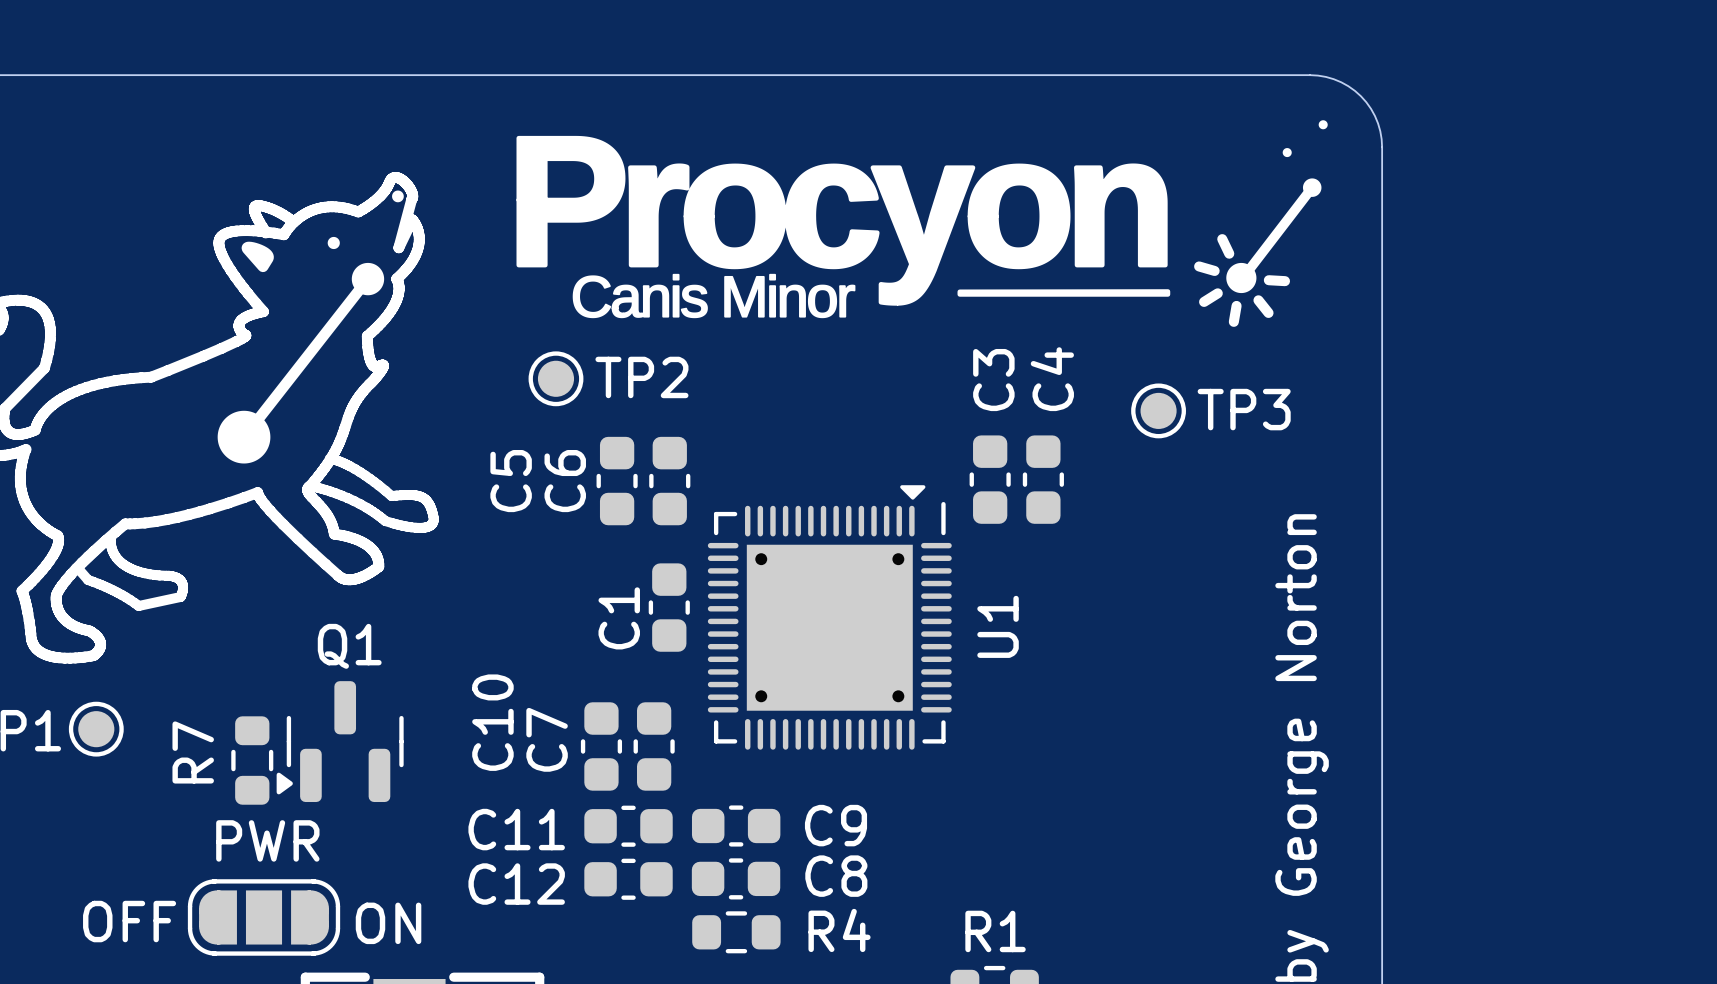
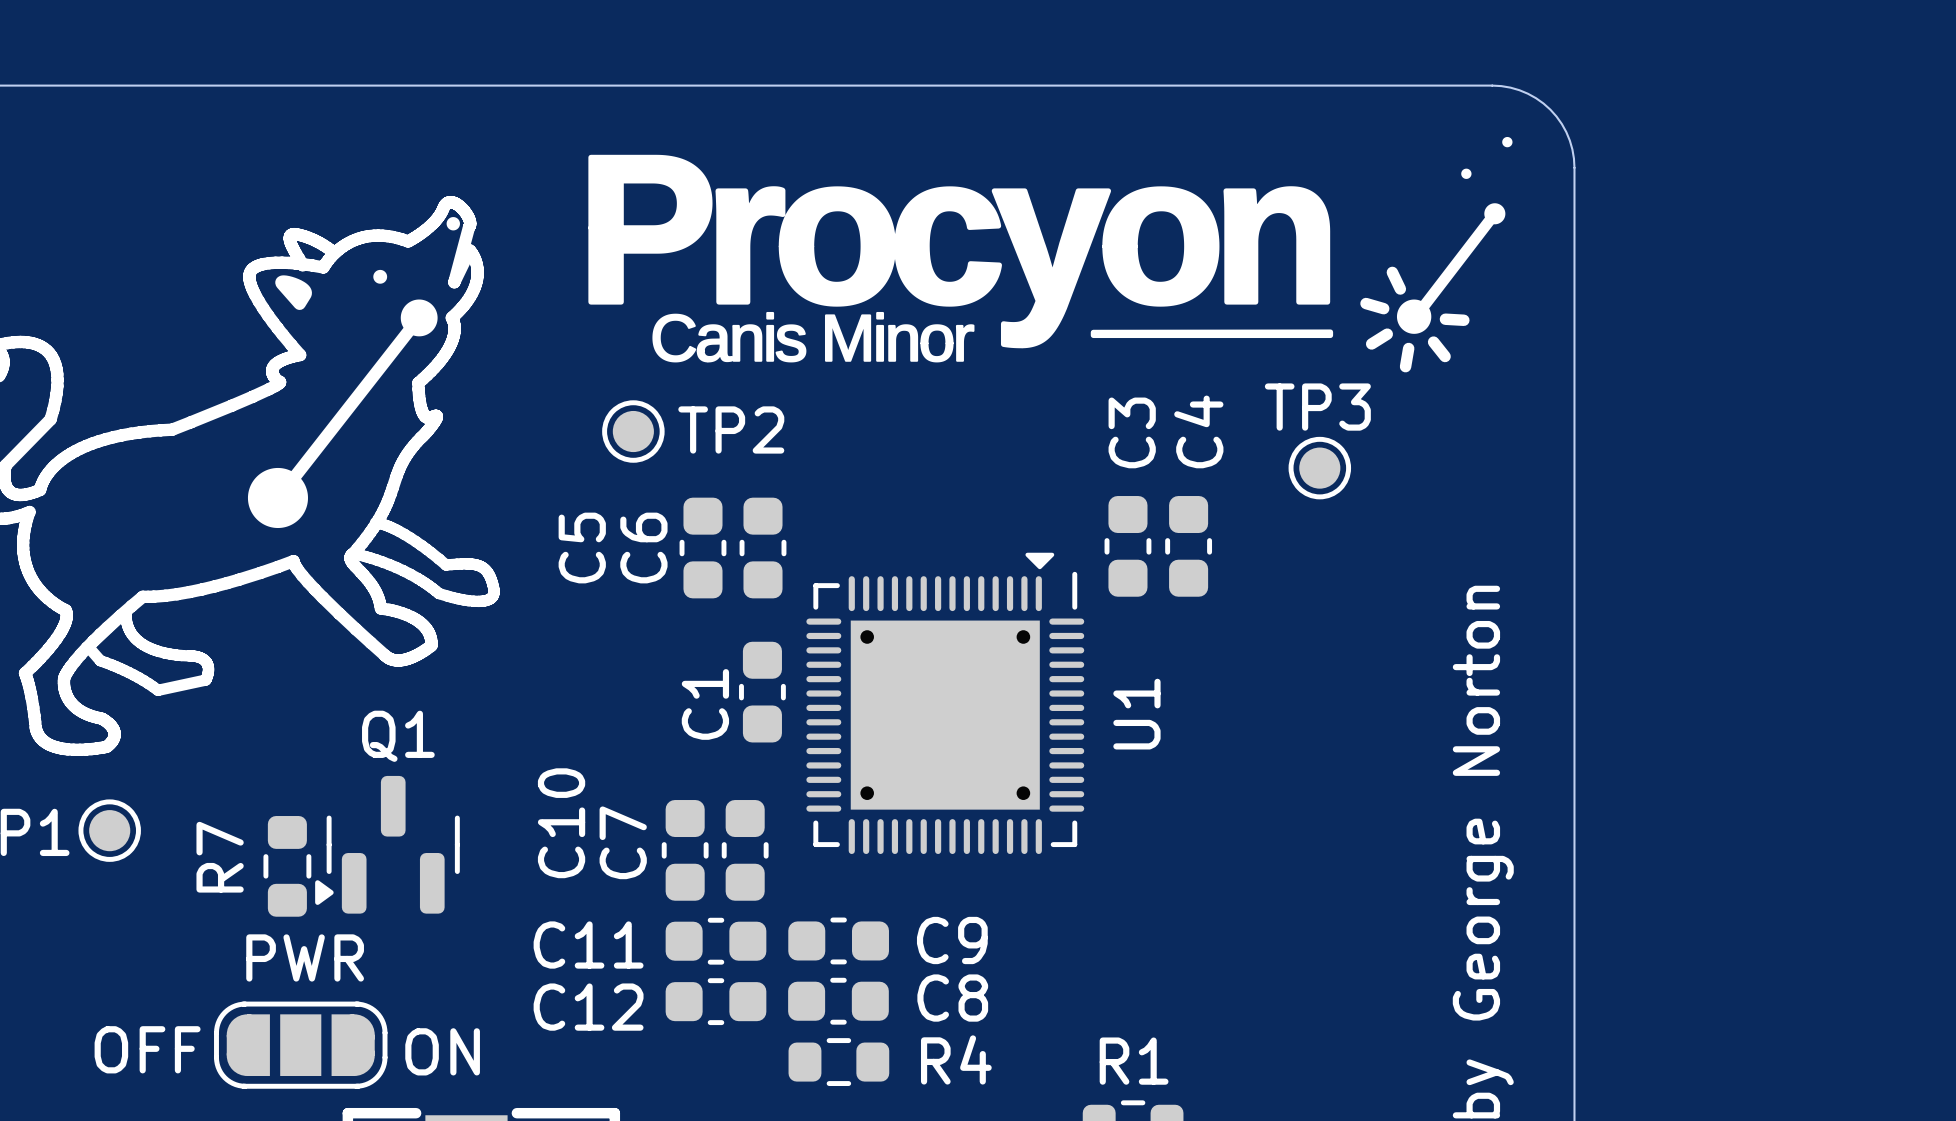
TP3 name position: TP3 (1244, 409) -> TP3 (1317, 407)

